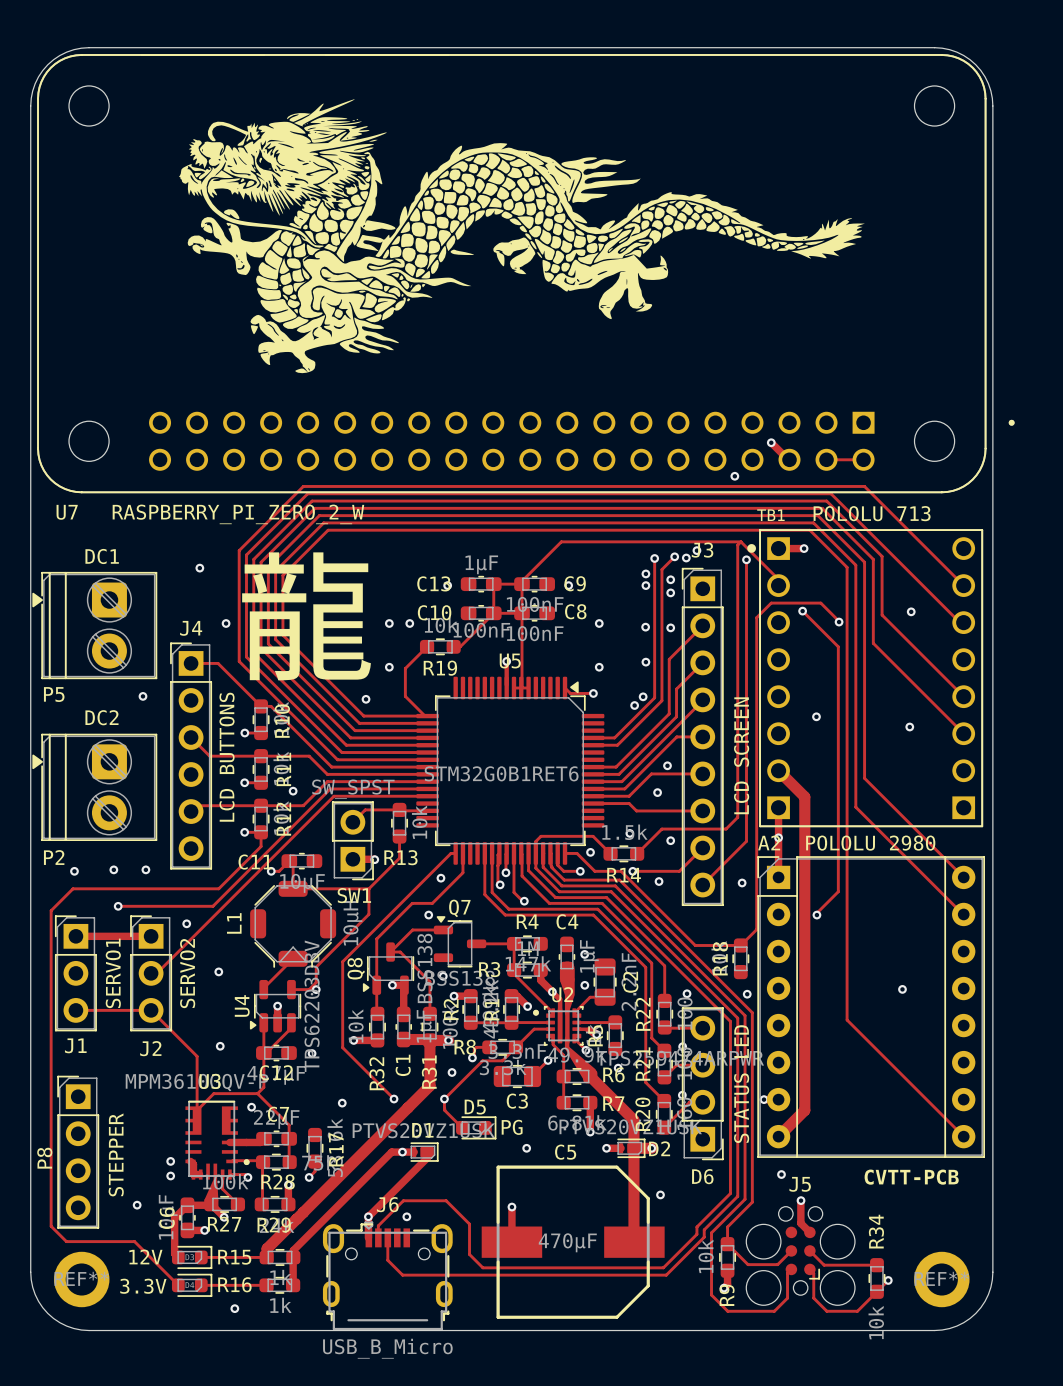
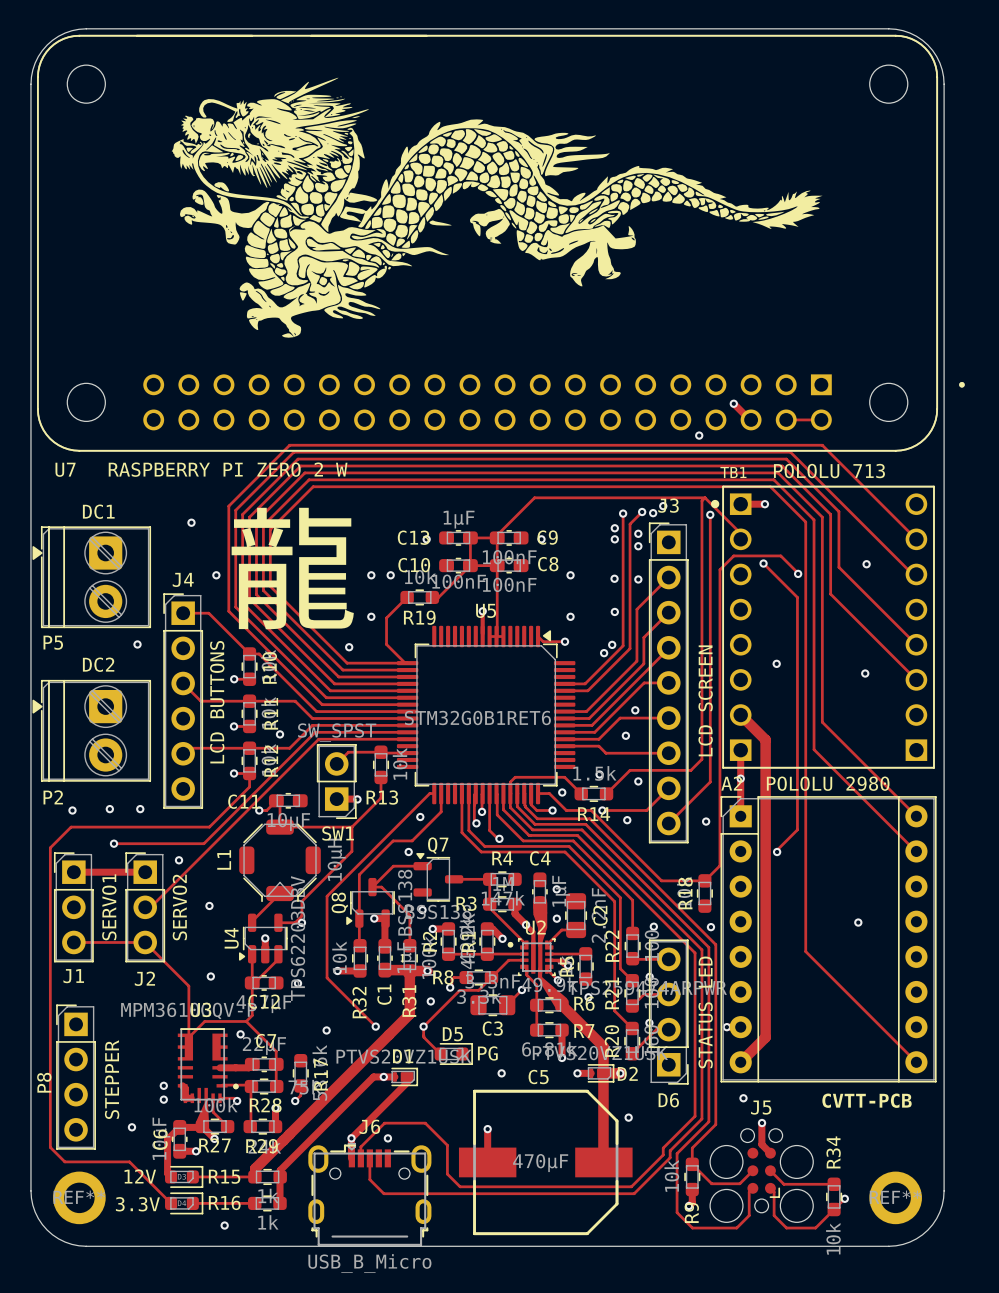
U7 value: RASPBERRY_PI_ZERO_2_W (238, 514) -> RASPBERRY PI ZERO 2 W (228, 469)

